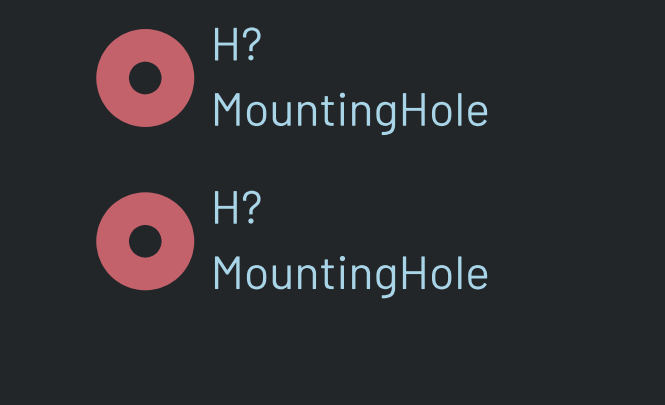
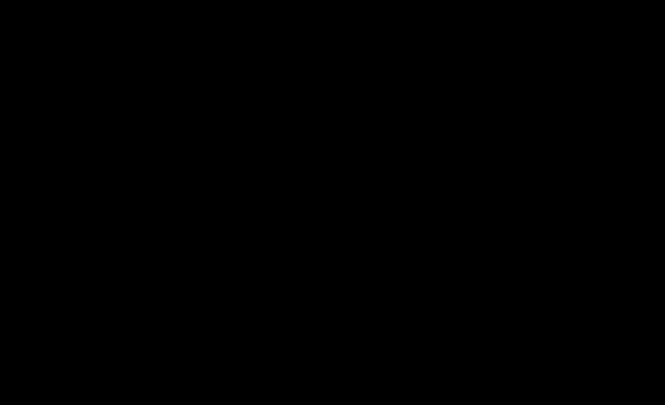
H?: MountingHole (145, 78) -> none
H?: MountingHole (145, 241) -> none

